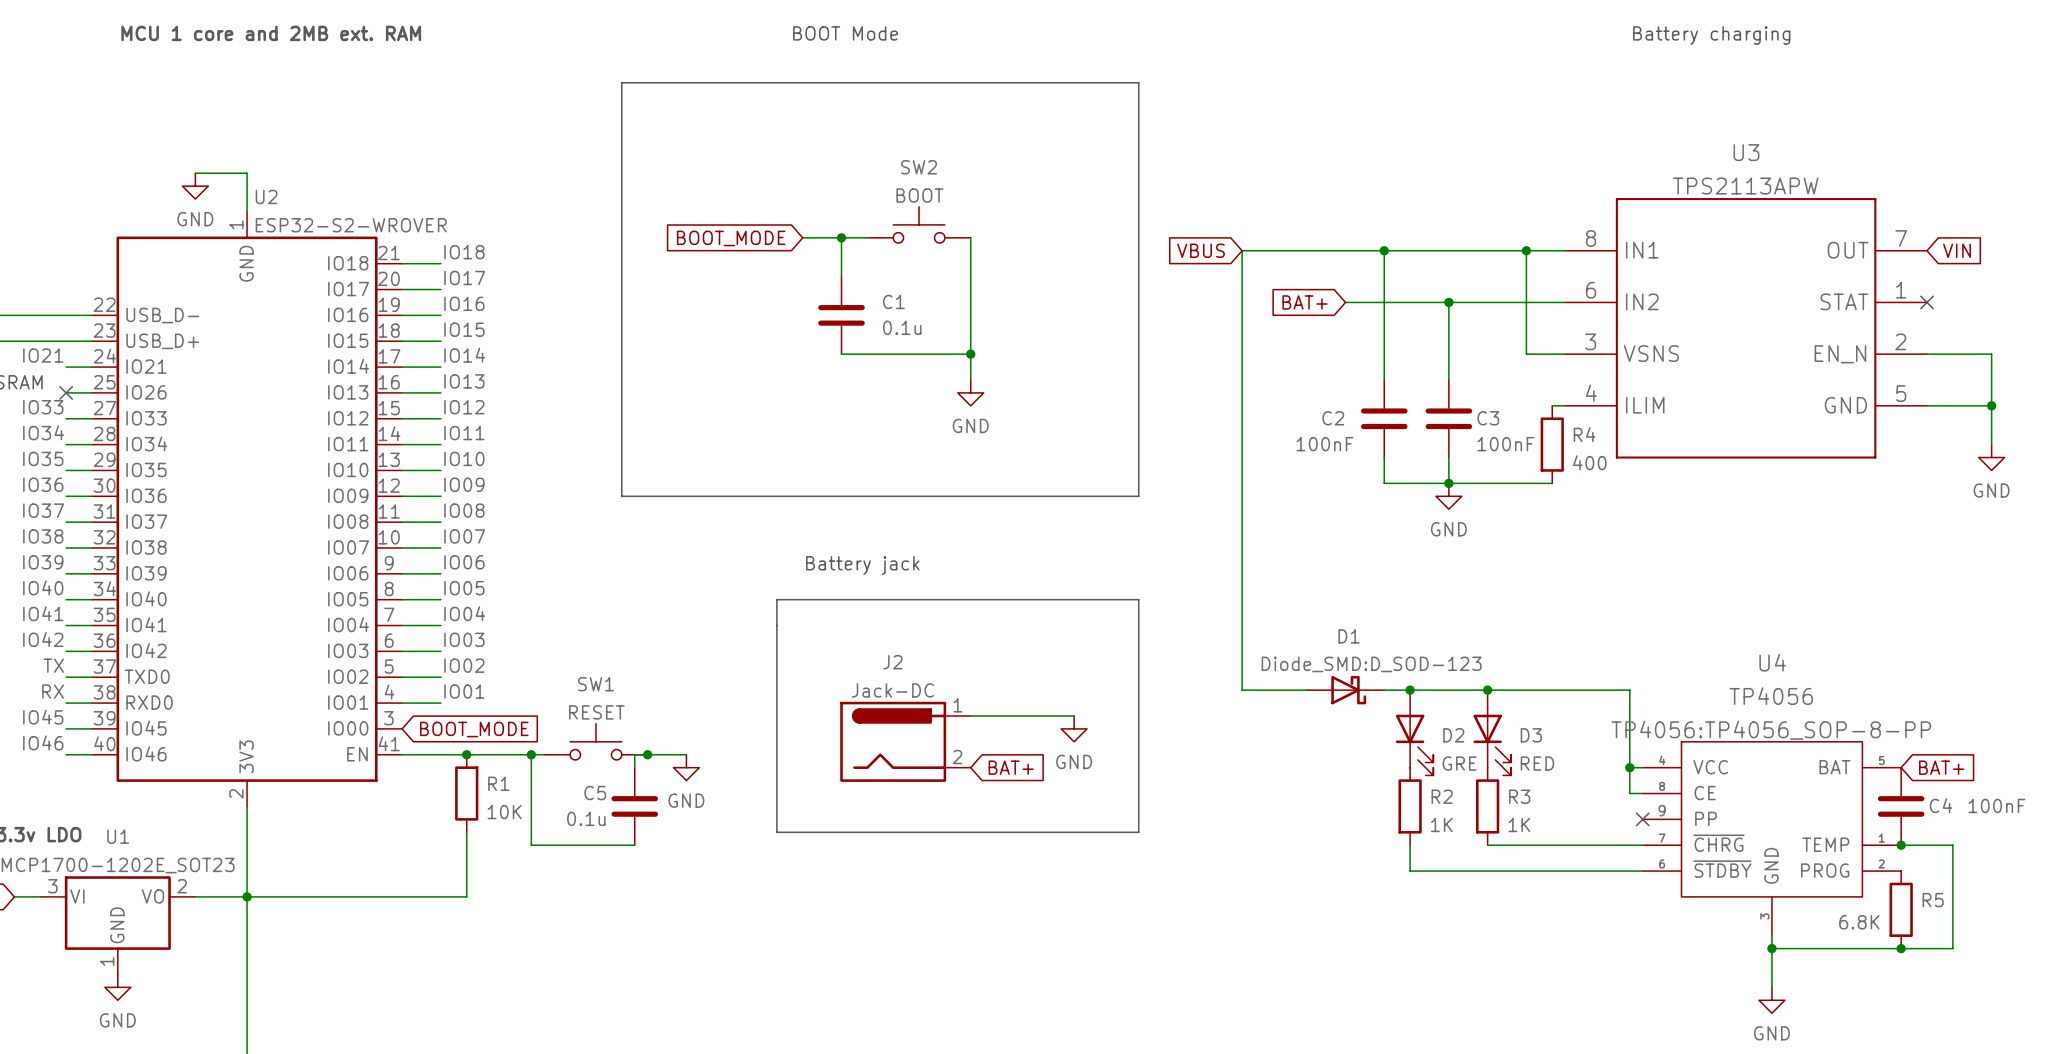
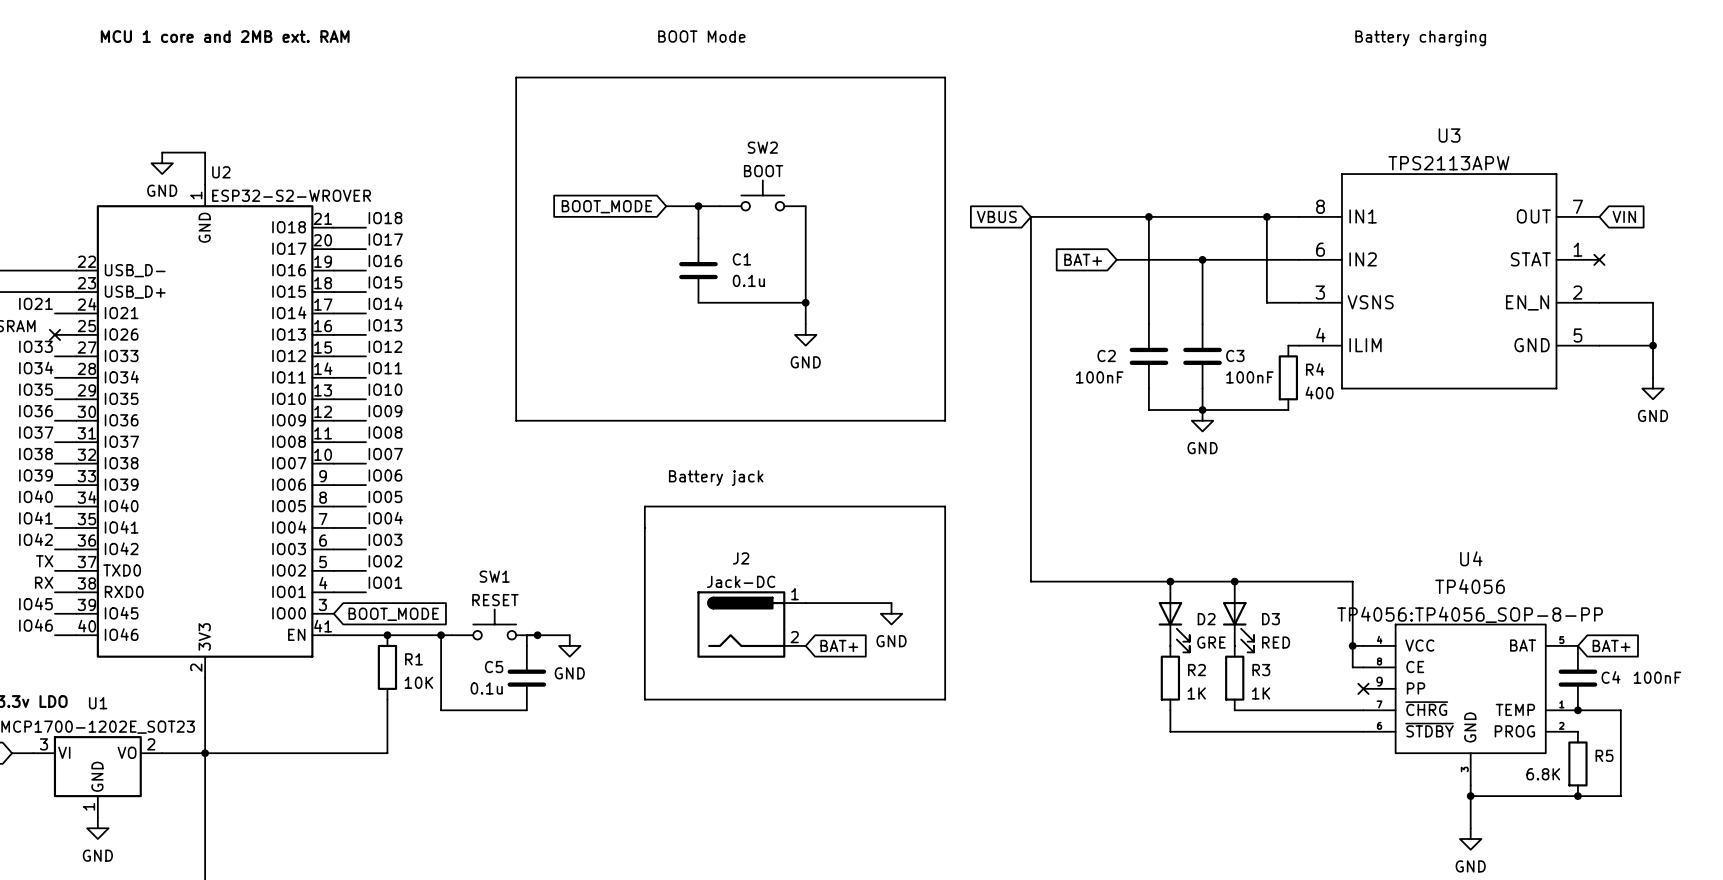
D1: (1345, 690) -> none

